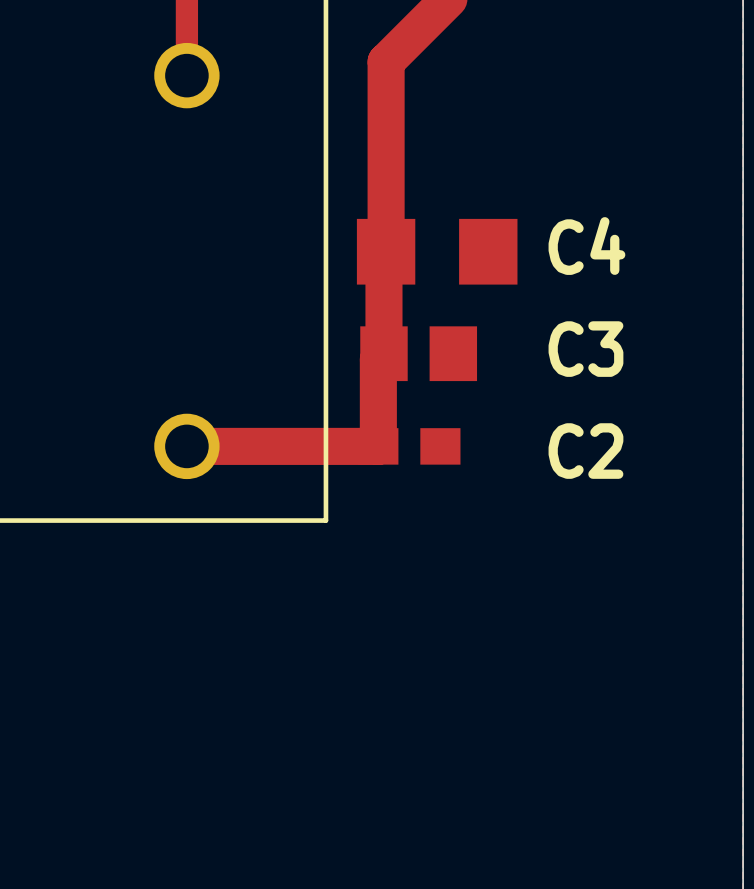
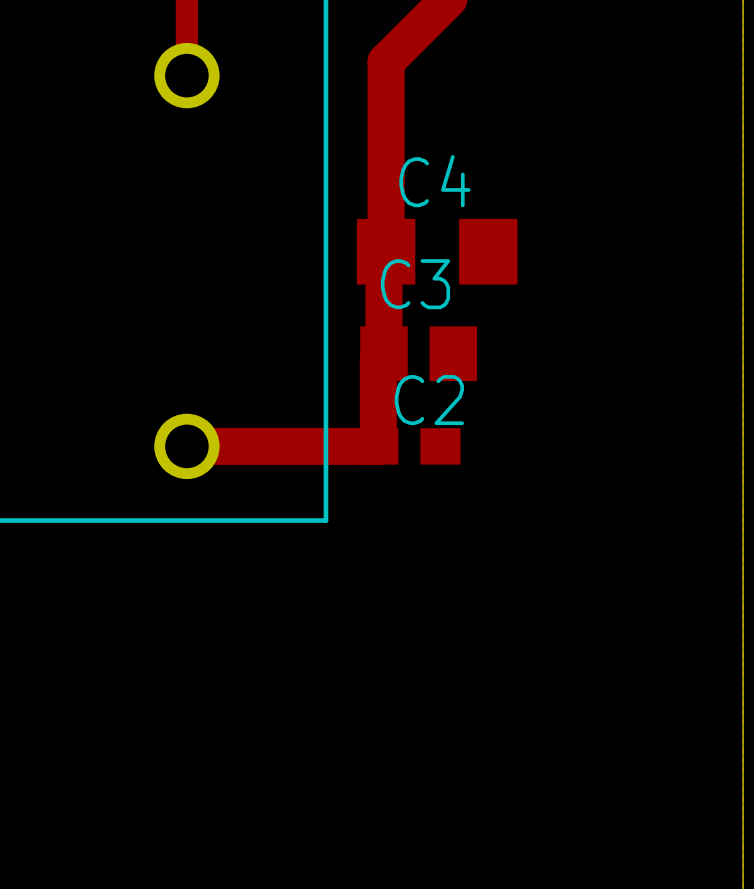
C4 name position: C4 (586, 246) -> C4 (434, 181)
C3 name position: C3 (585, 349) -> C3 (415, 284)
C2 name position: C2 (585, 451) -> C2 (429, 400)

